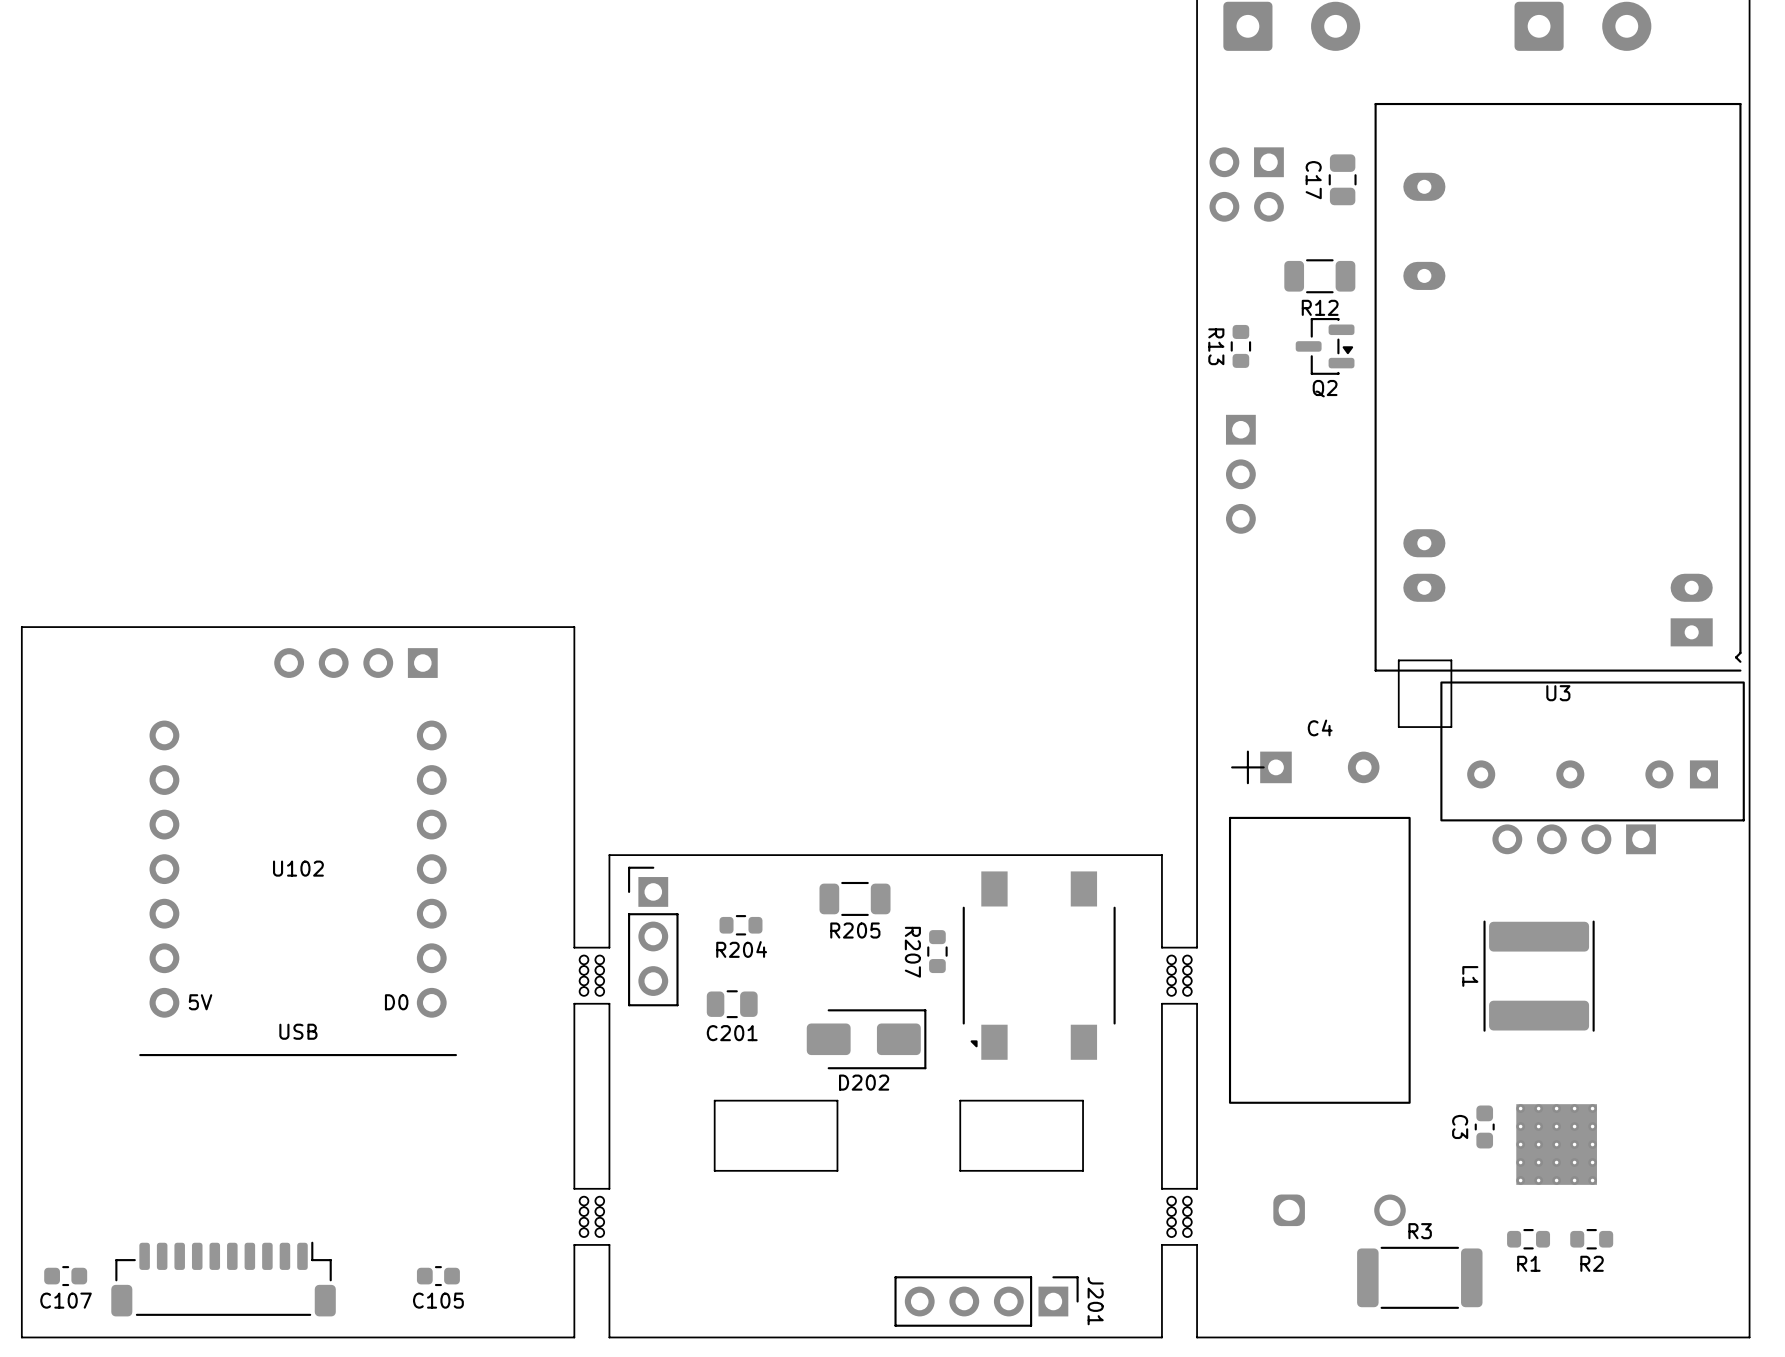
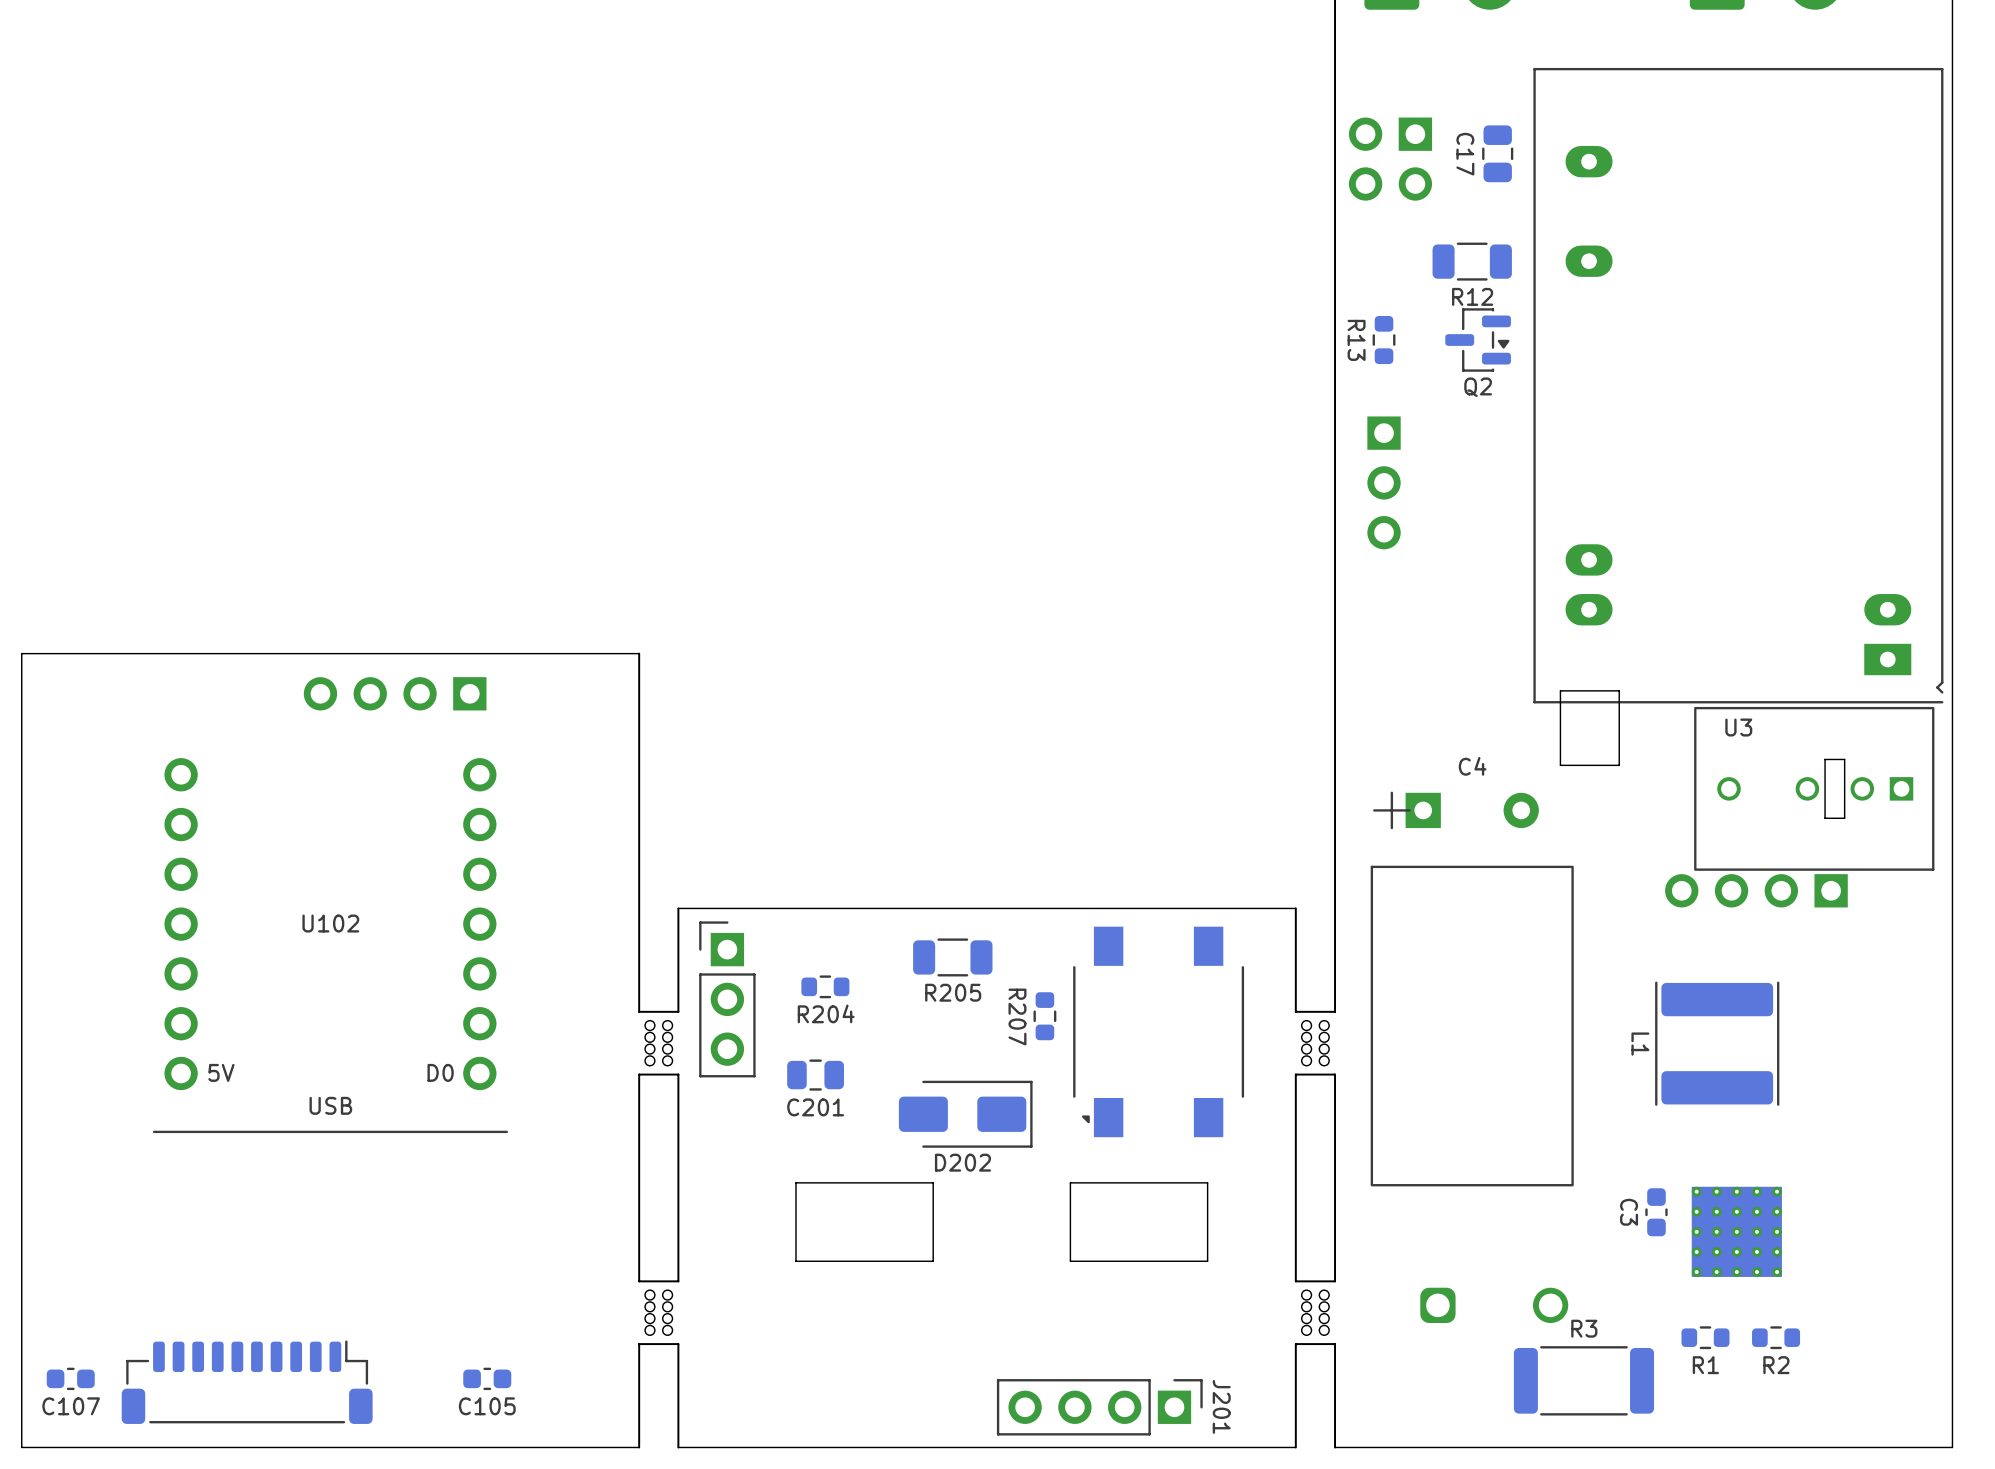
board edge: none -> (1844, 759) (1844, 818) (1825, 818) (1825, 759) (1844, 759)
part: none -> (1814, 788)
part: (1592, 751) -> none

